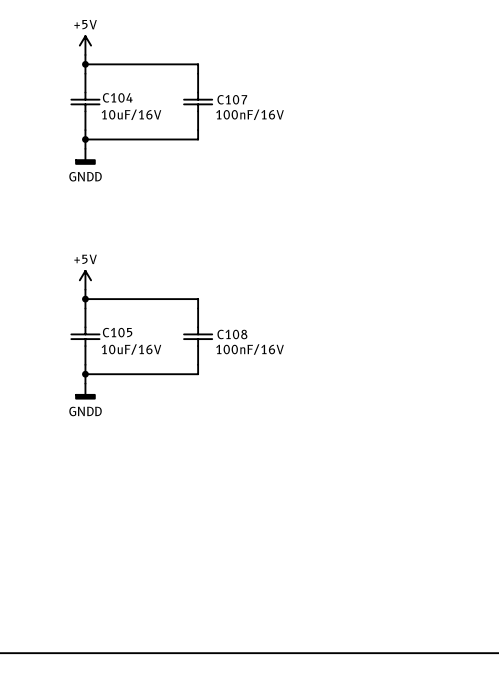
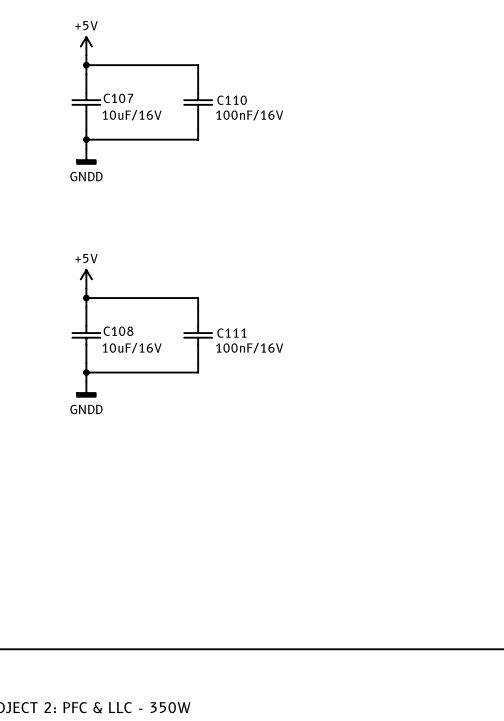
C104 name: C104 (117, 97) -> C107 (118, 98)
C107 name: C107 (232, 99) -> C110 (232, 100)
C105 name: C105 (117, 332) -> C108 (118, 331)
C108 name: C108 (232, 334) -> C111 (231, 333)

